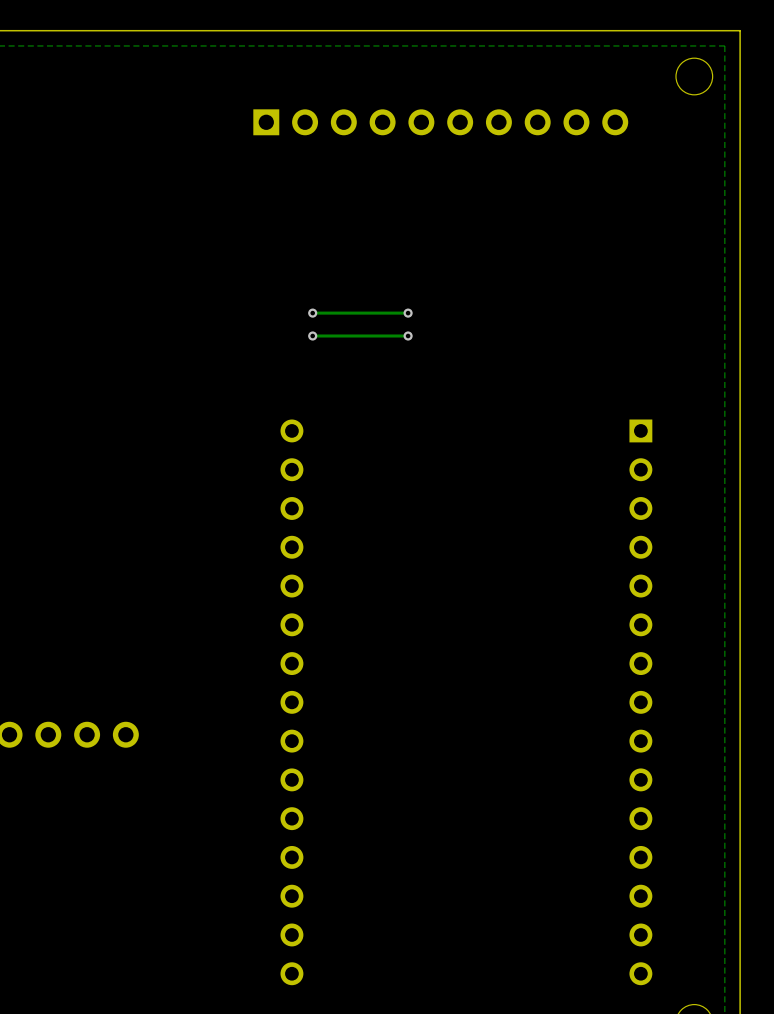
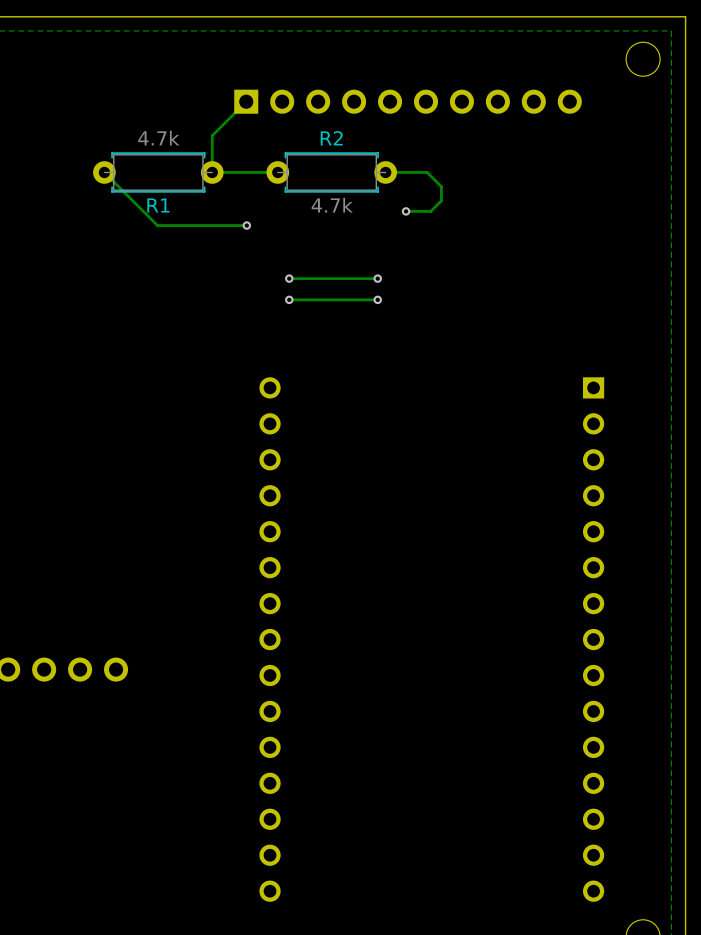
track: none -> (246, 101) (212, 135) (212, 172) (277, 172)
track: none -> (104, 172) (157, 225) (246, 225)
R1: none -> 4.7k (158, 172)
R2: none -> 4.7k (331, 172)
track: none -> (385, 172) (427, 172) (441, 186) (441, 200) (430, 211) (406, 211)
via: none -> (406, 211)
via: none -> (246, 225)

